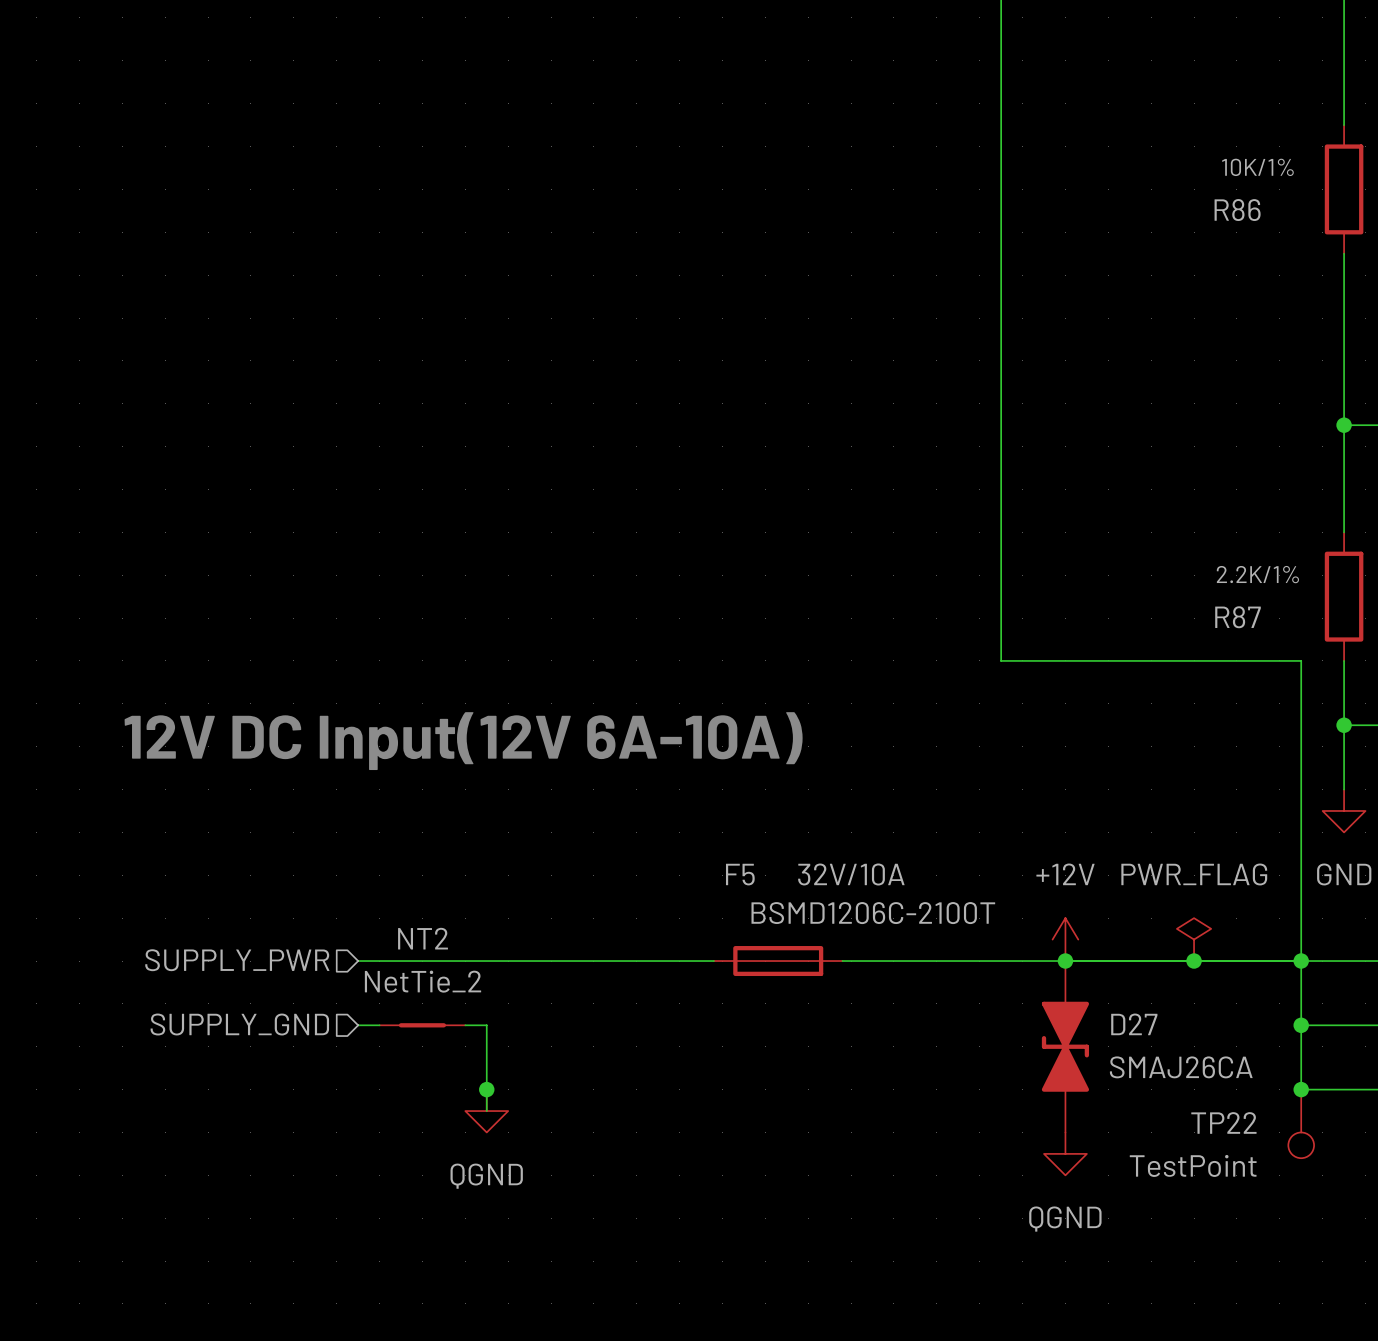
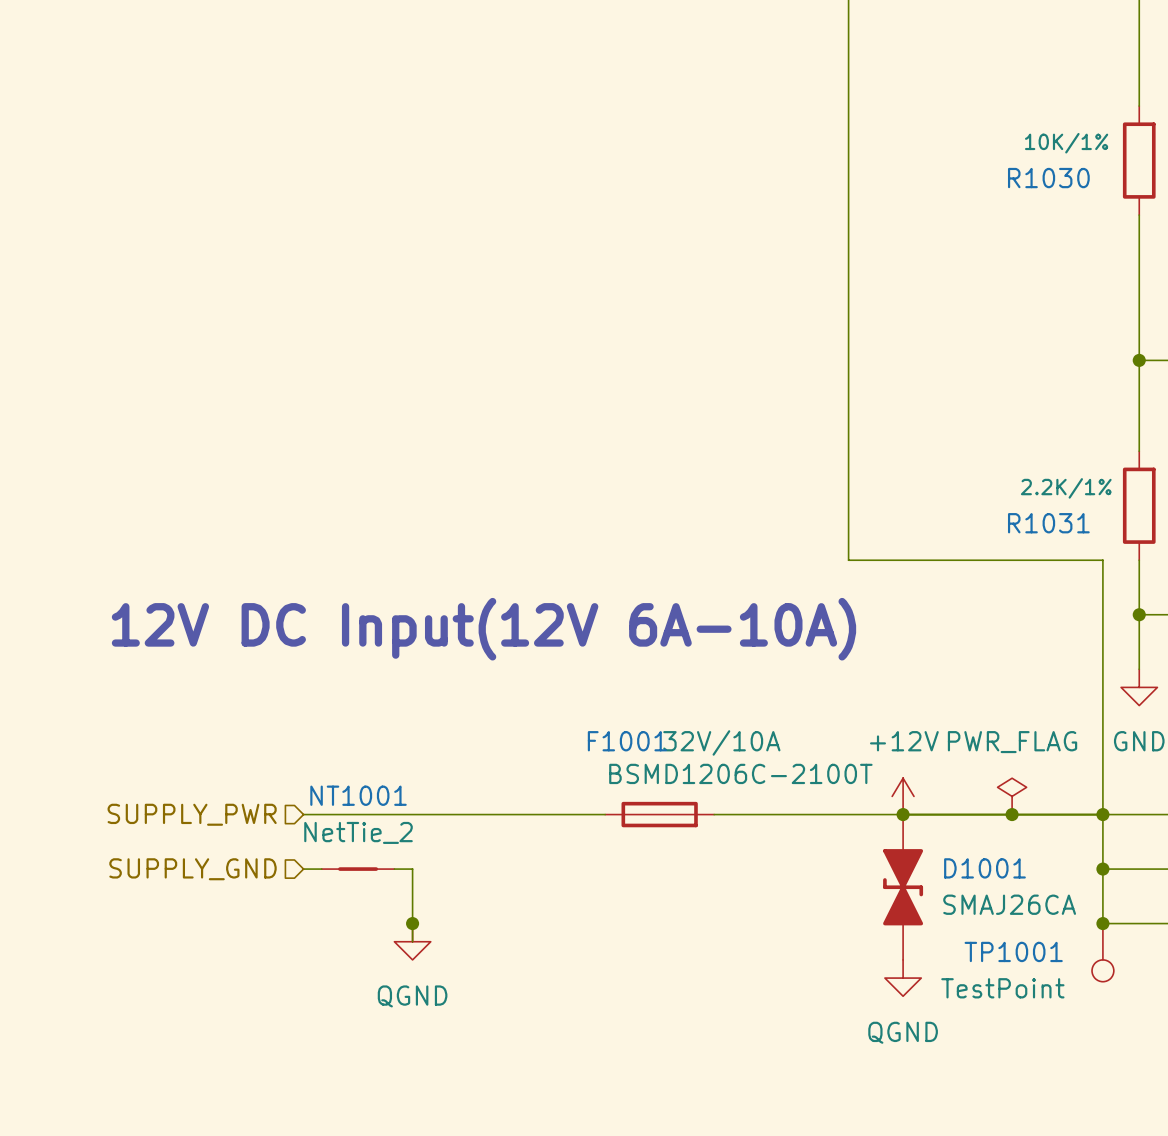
R86 name: R86 (1237, 210) -> R1030 (1048, 178)
R87 name: R87 (1238, 617) -> R1031 (1048, 523)
F5 name: F5 (740, 874) -> F1001 (627, 741)
NT2 name: NT2 (423, 938) -> NT1001 (358, 795)
D27 name: D27 (1134, 1024) -> D1001 (984, 868)
TP22 name: TP22 (1223, 1122) -> TP1001 (1013, 951)

